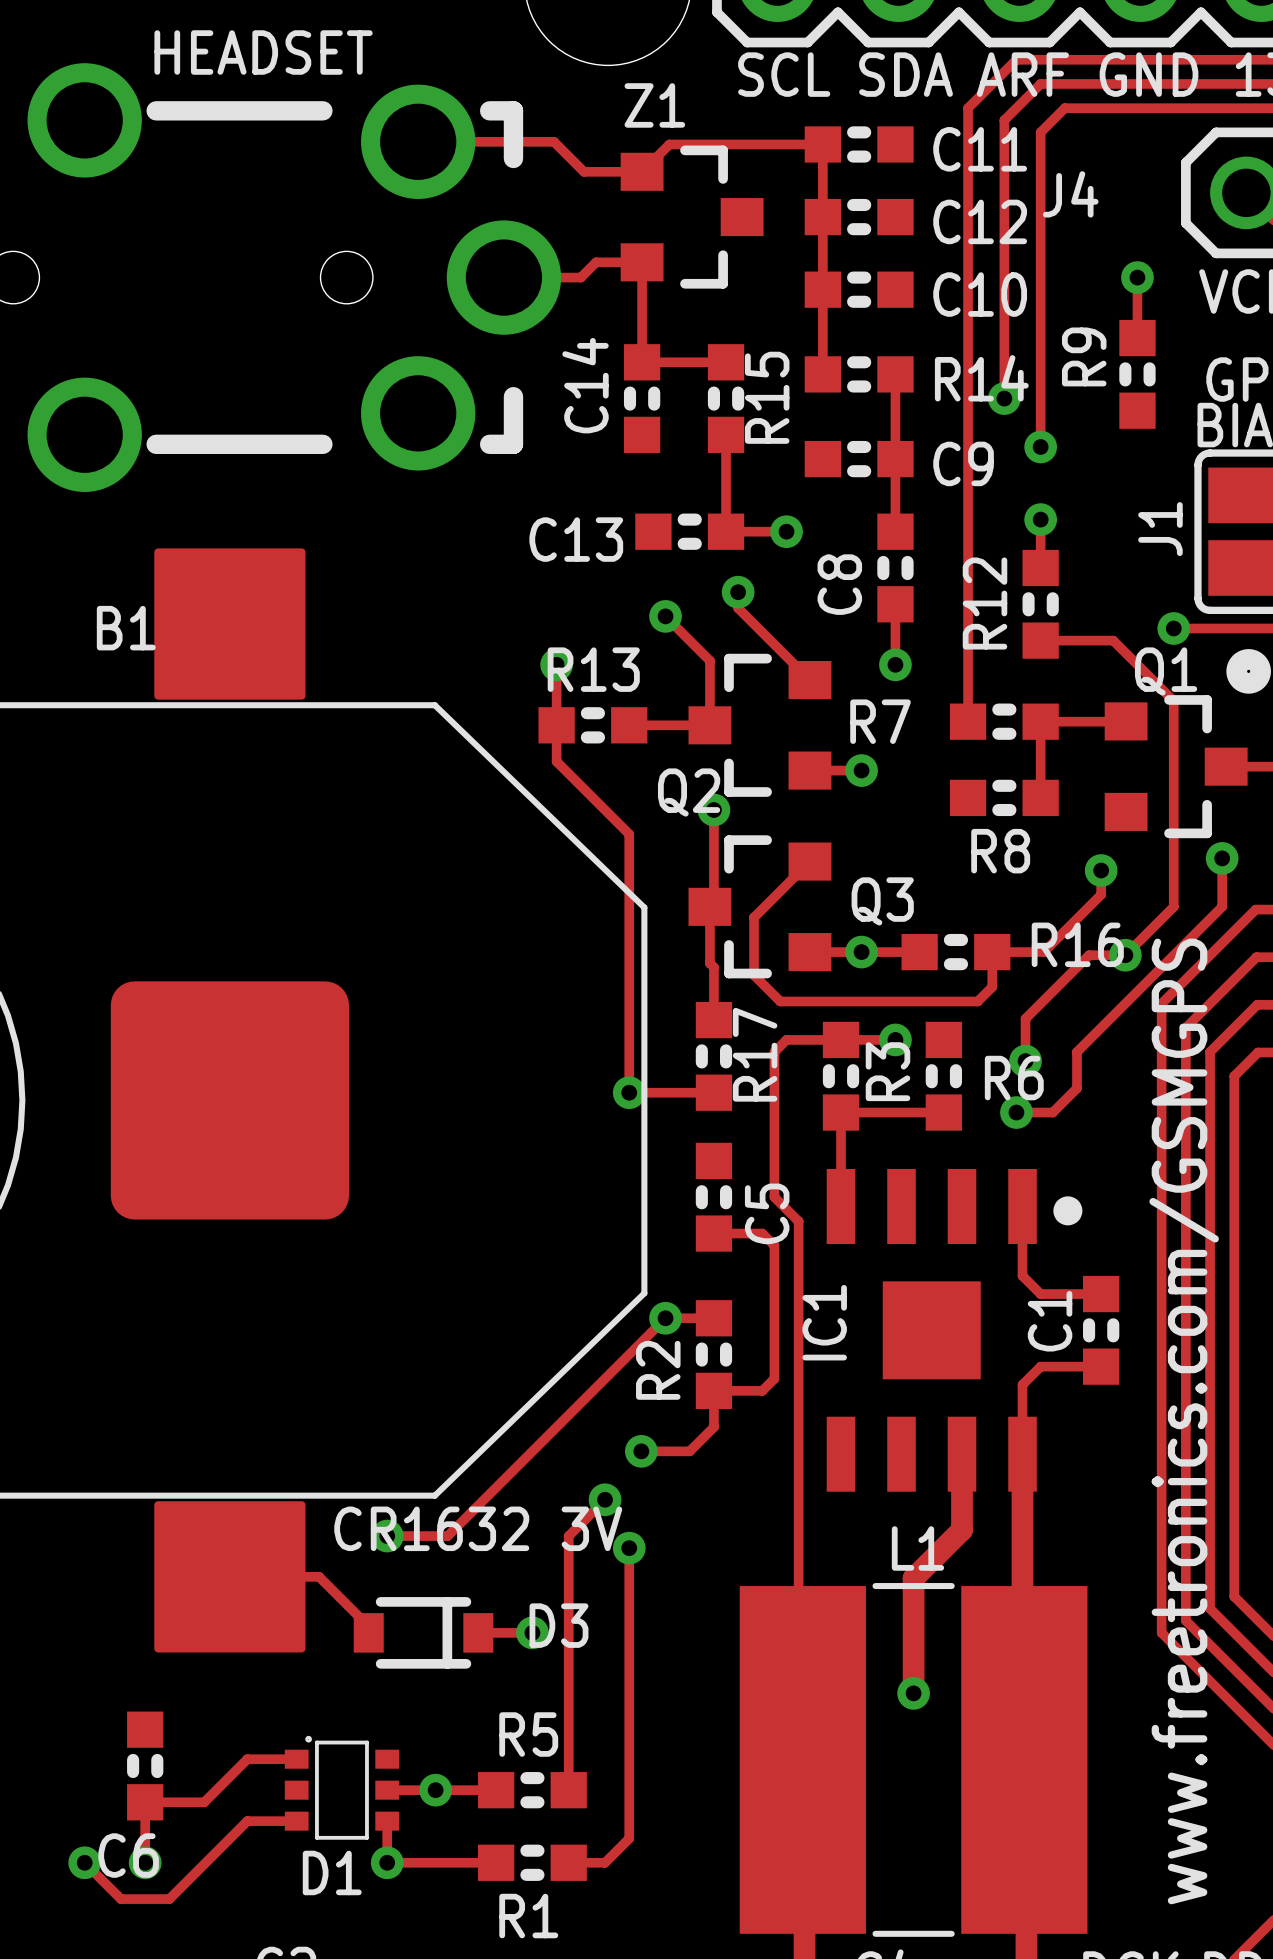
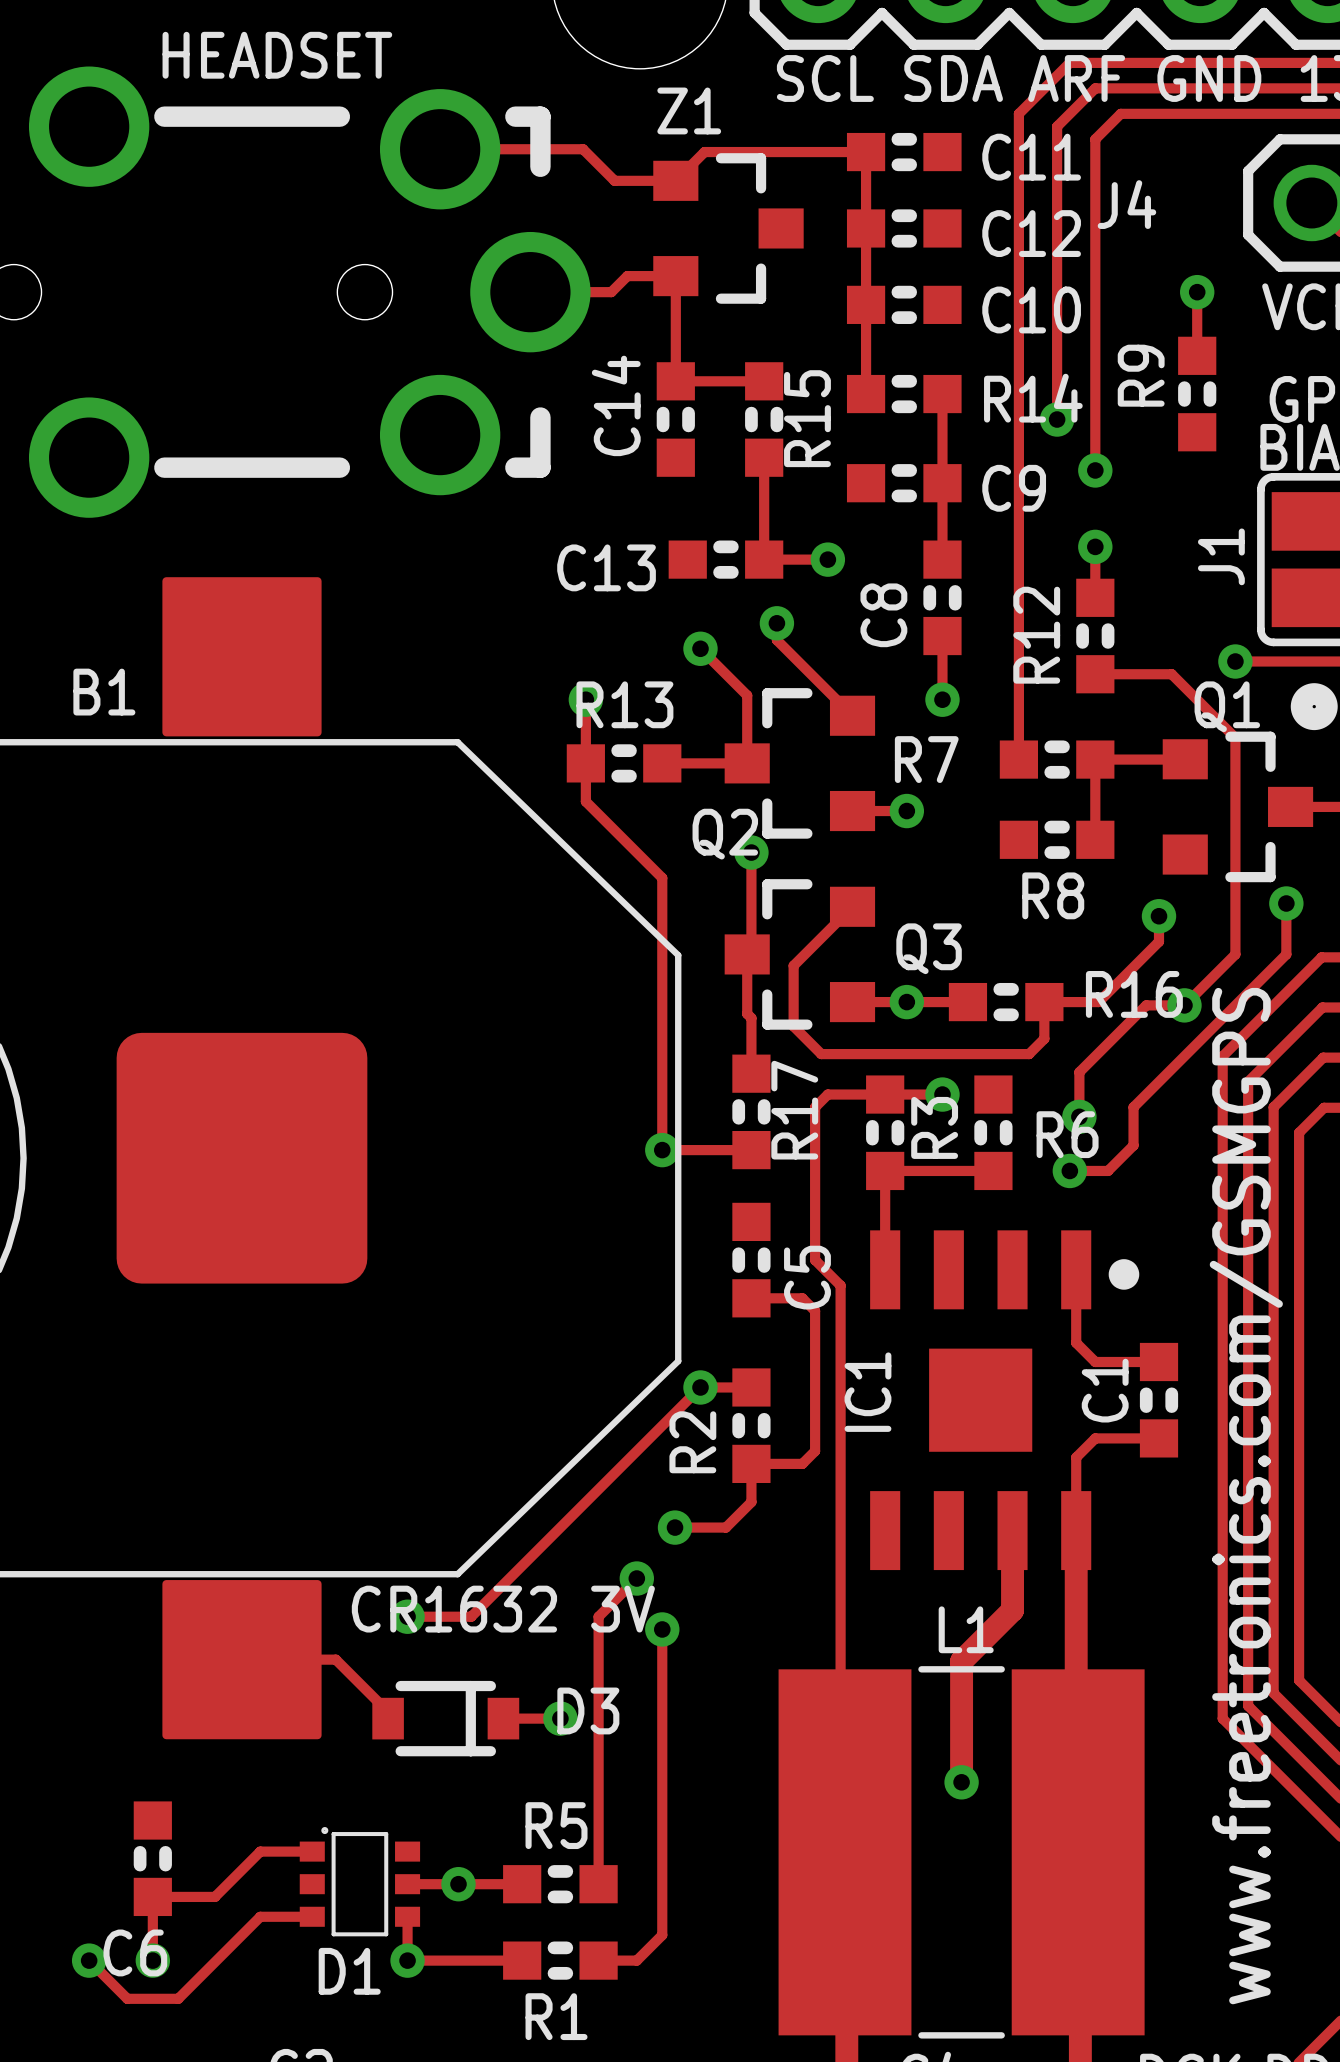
text position: B1 (126, 628) -> B1 (104, 692)

